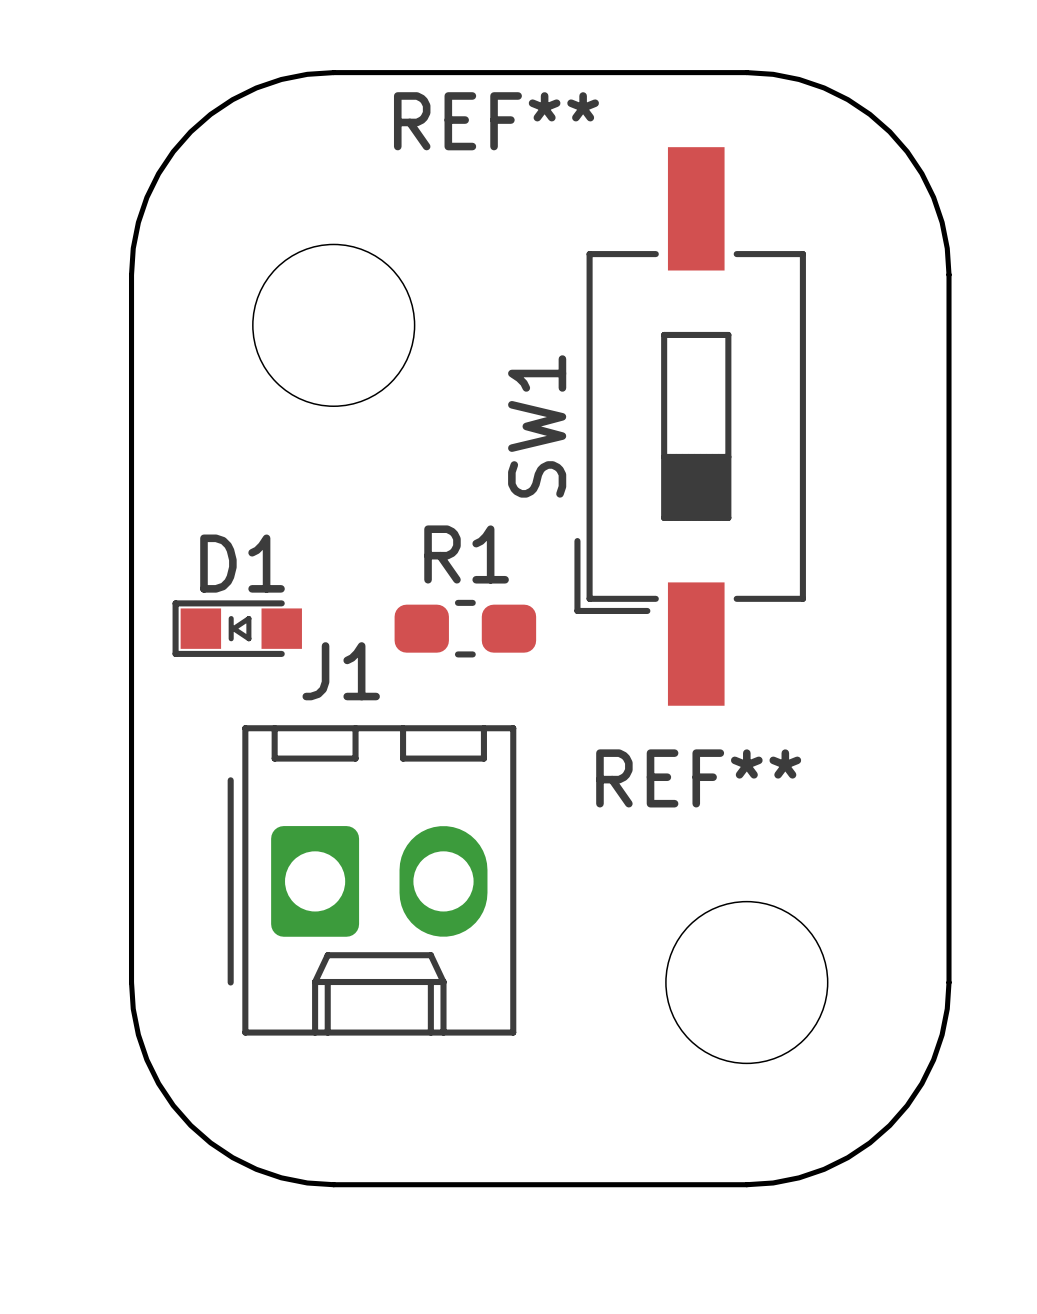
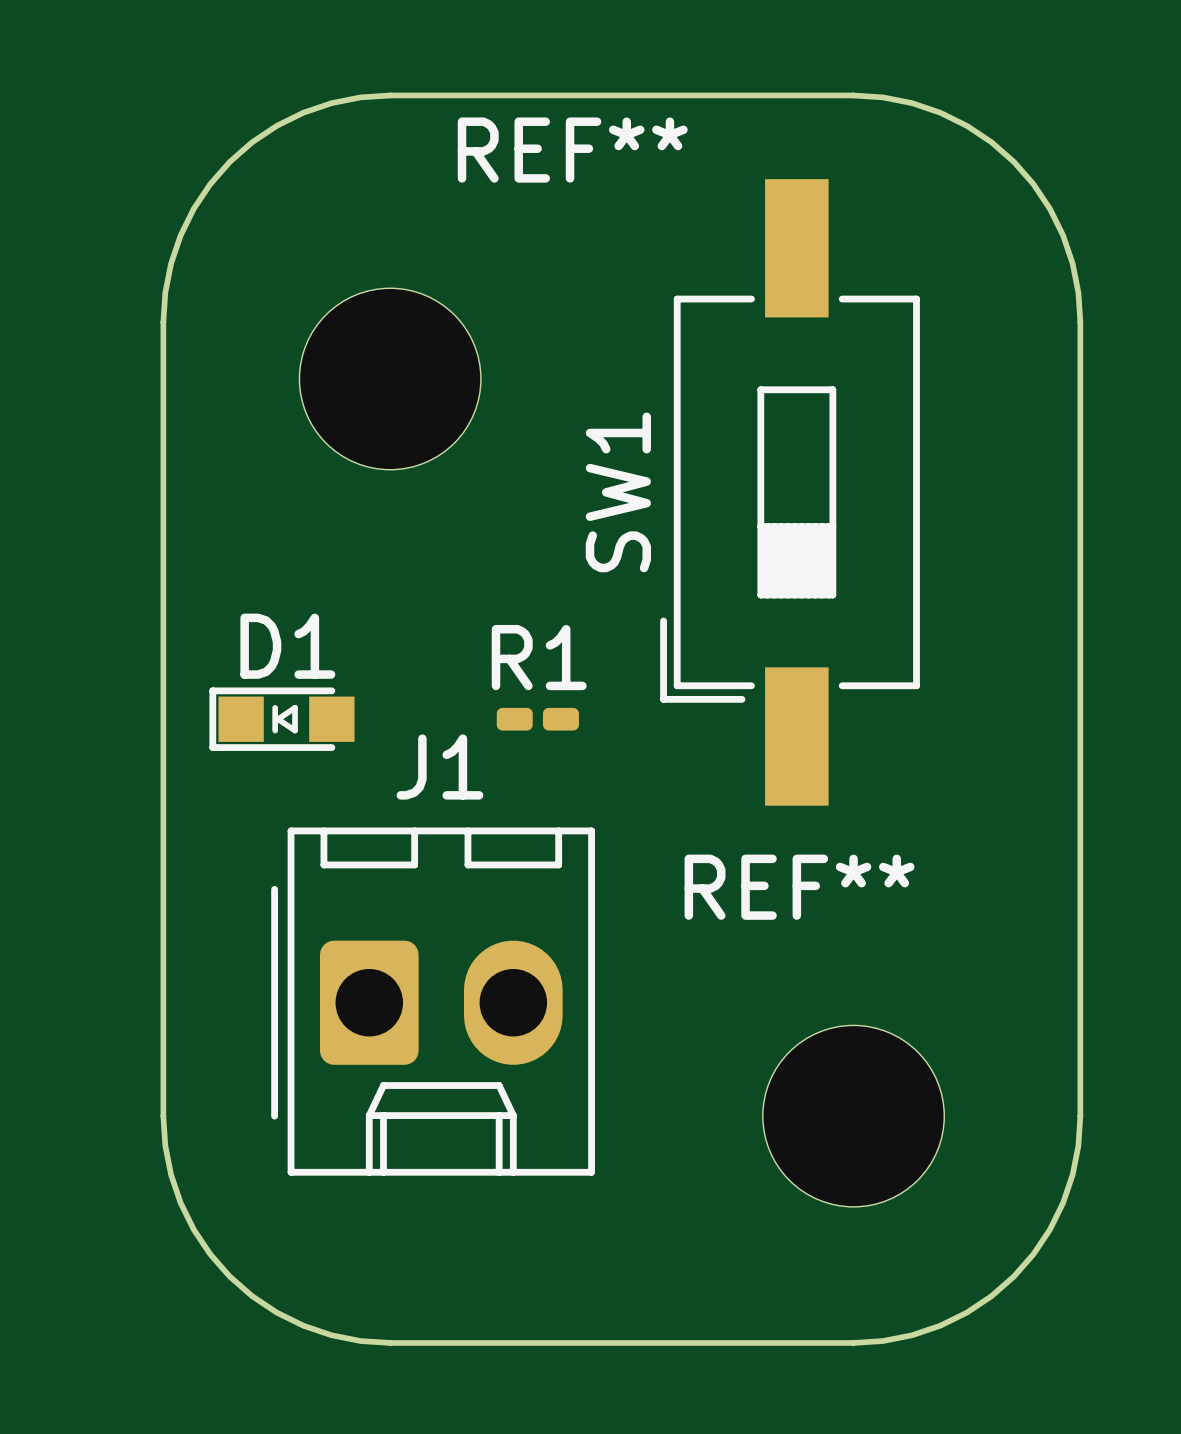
R1 footprint: [394, 599, 537, 658] -> [496, 707, 579, 731]
J1 name position: J1 (341, 671) -> J1 (439, 766)

